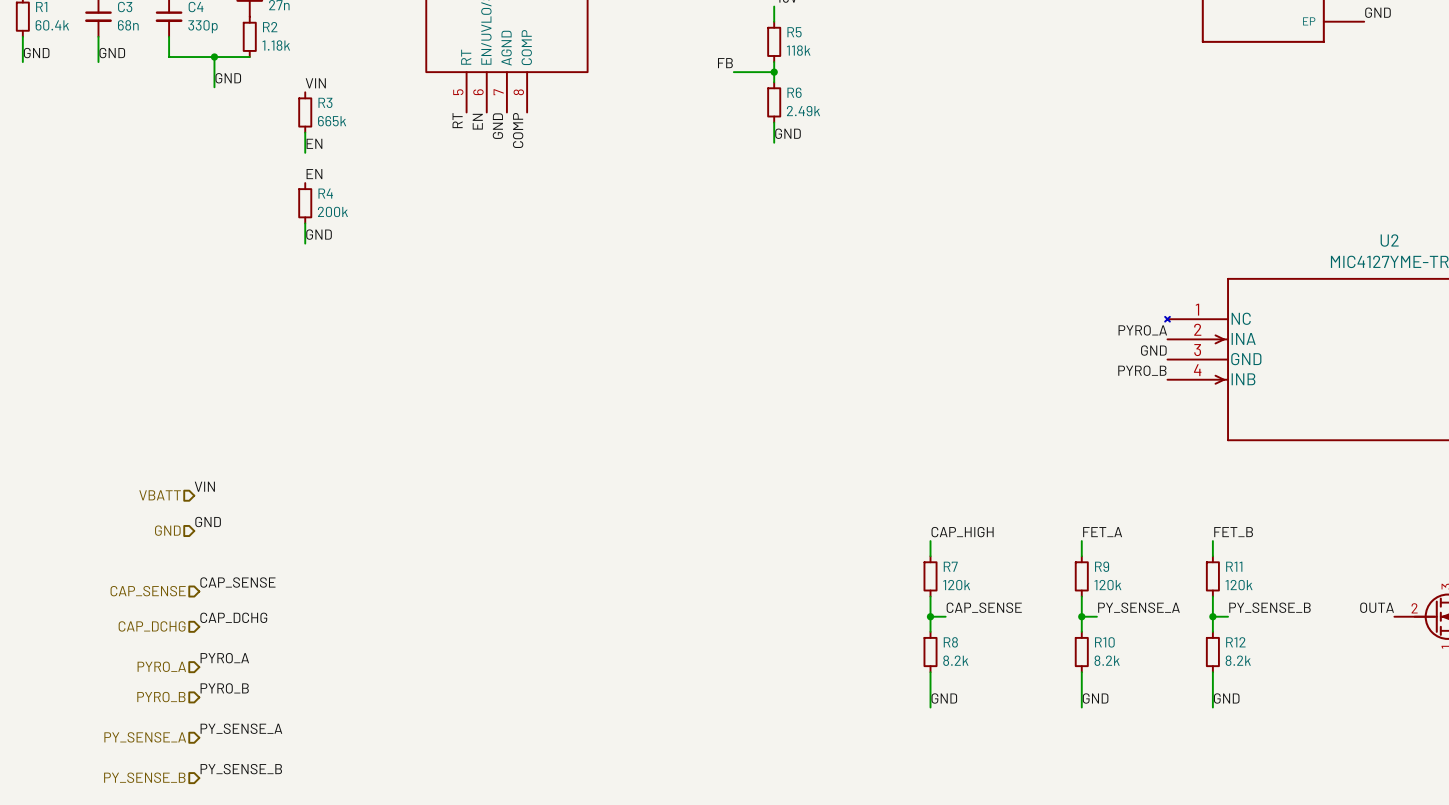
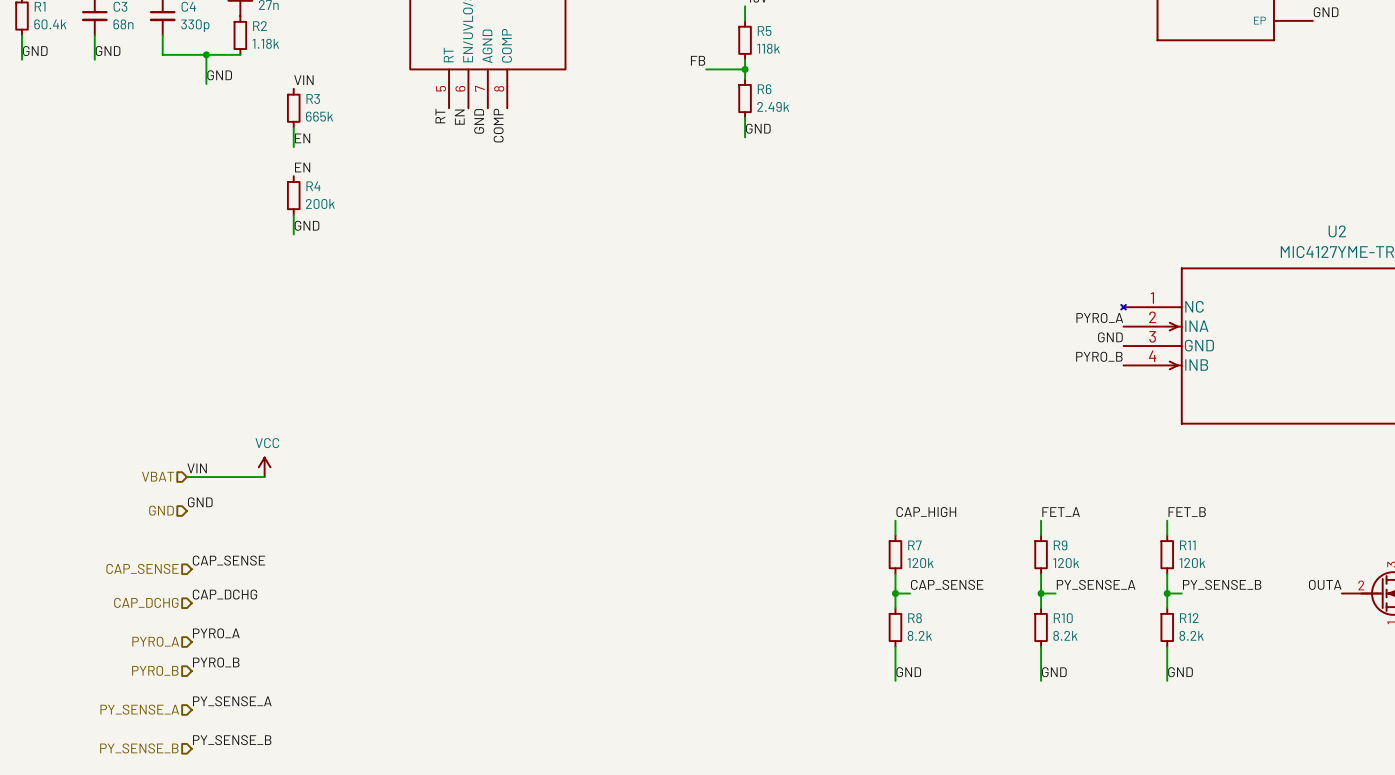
power symbol: none -> VCC (264, 467)
hierarchical label: VBATT (160, 495) -> VBAT (158, 476)
wire: none -> (186, 477) (264, 477)

